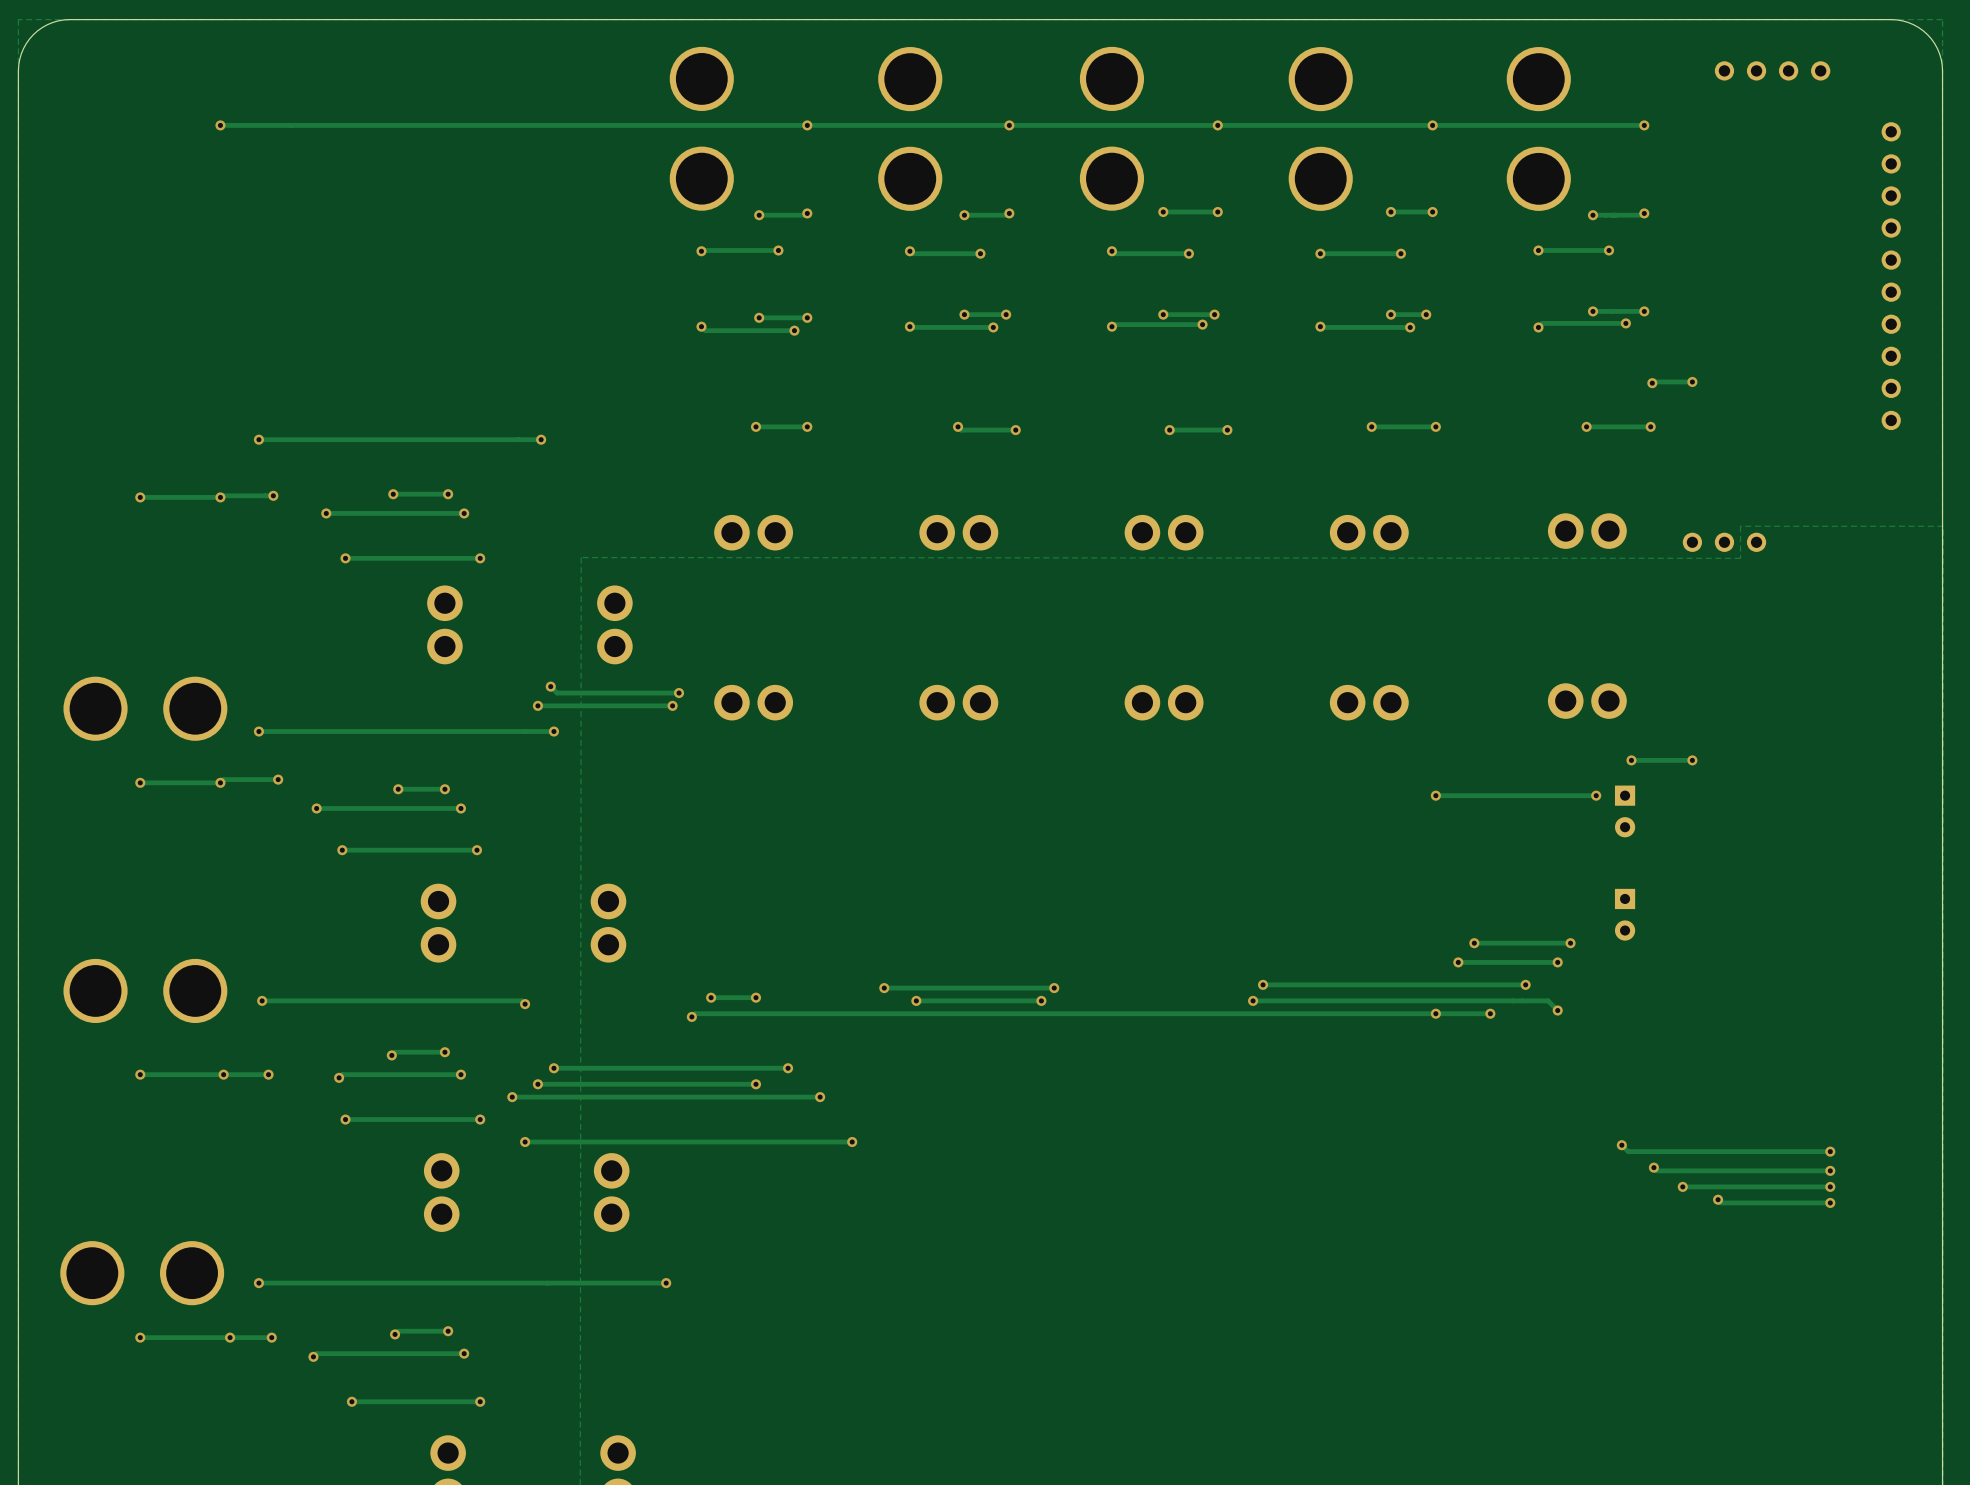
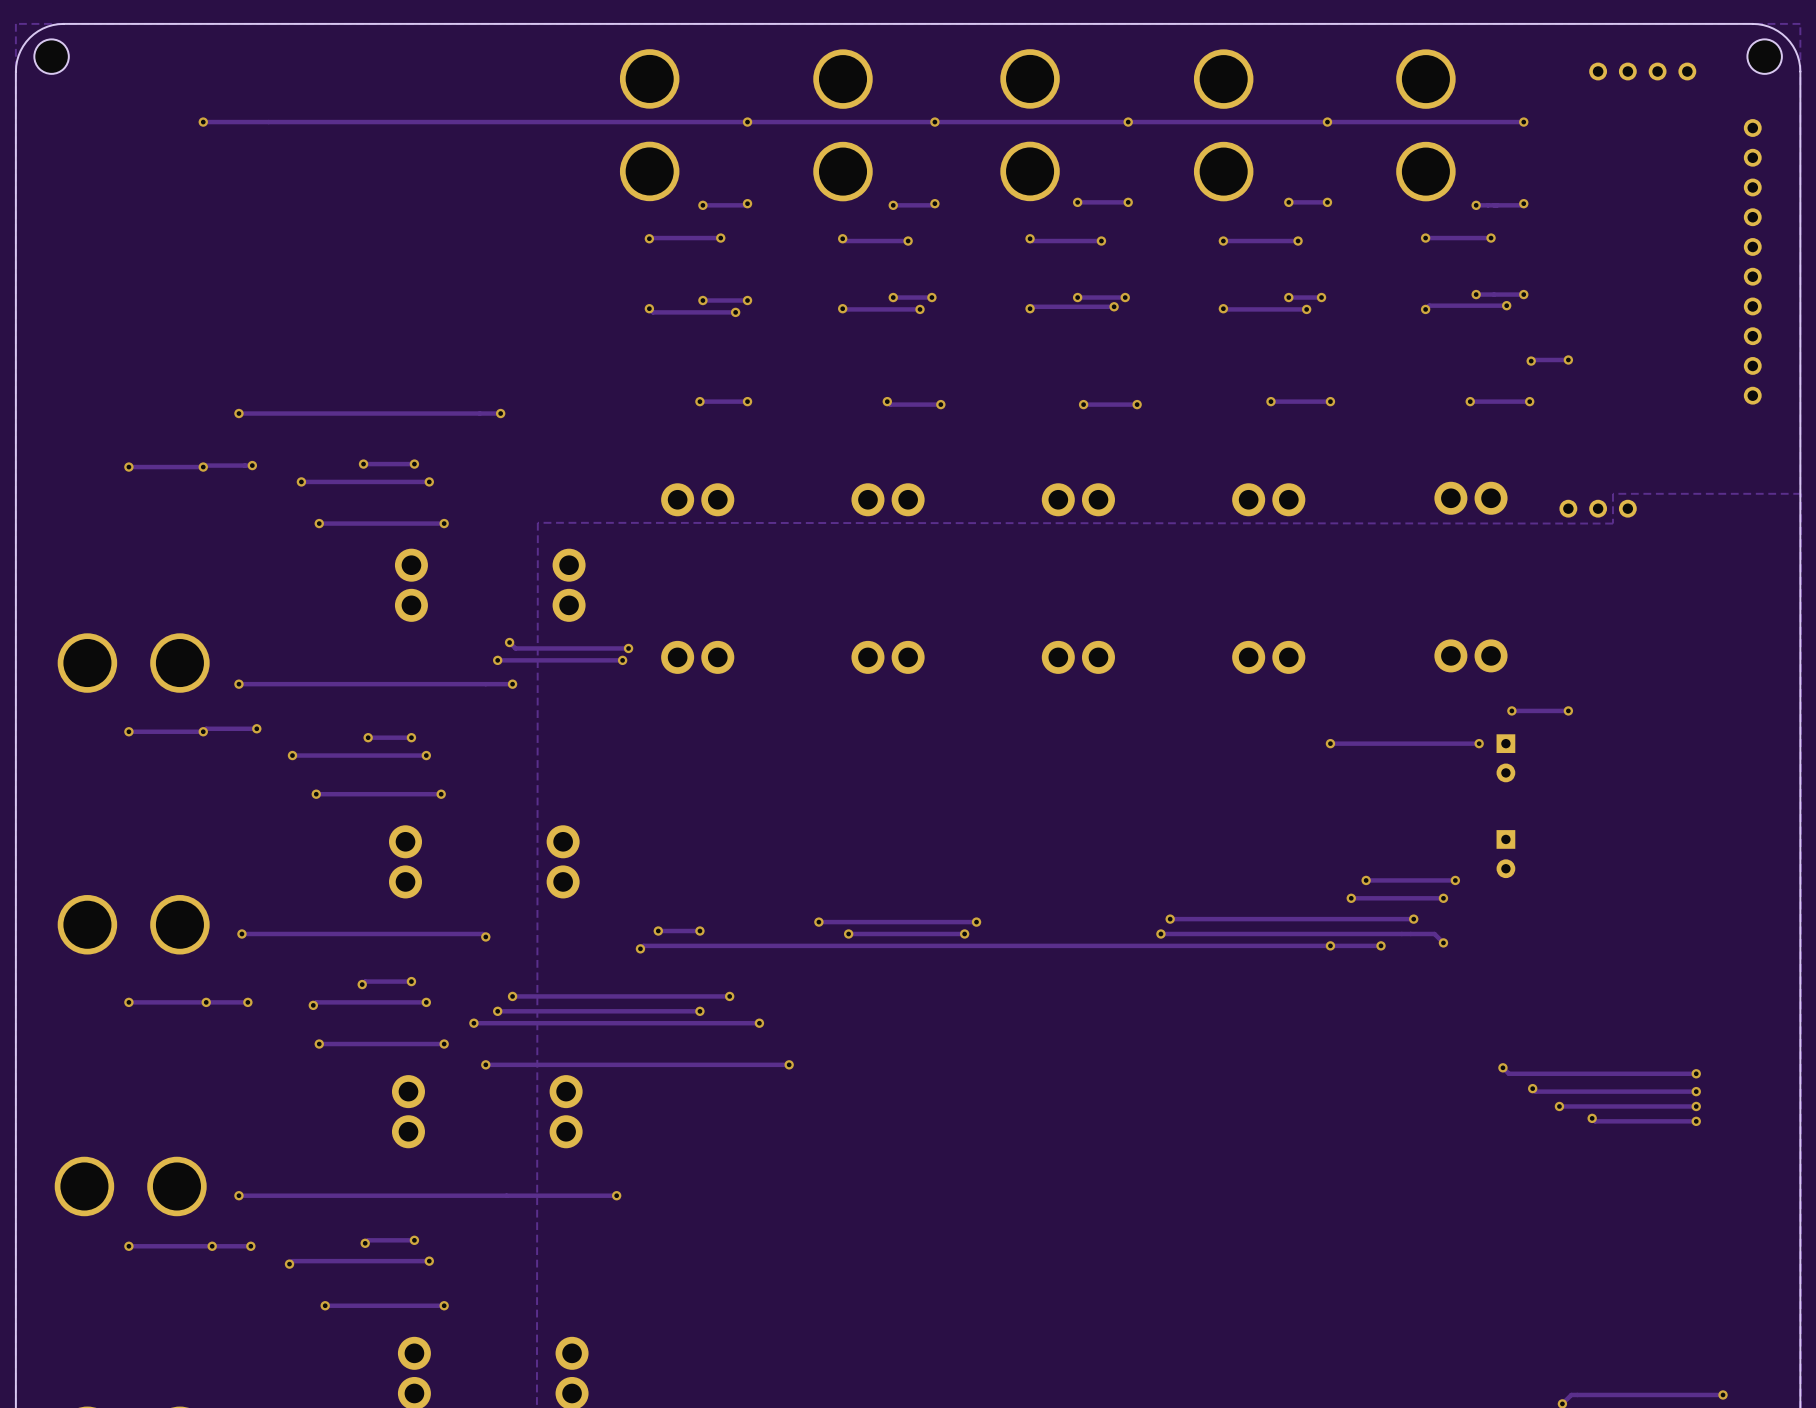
part: none -> (51, 56)
part: none -> (1764, 56)

